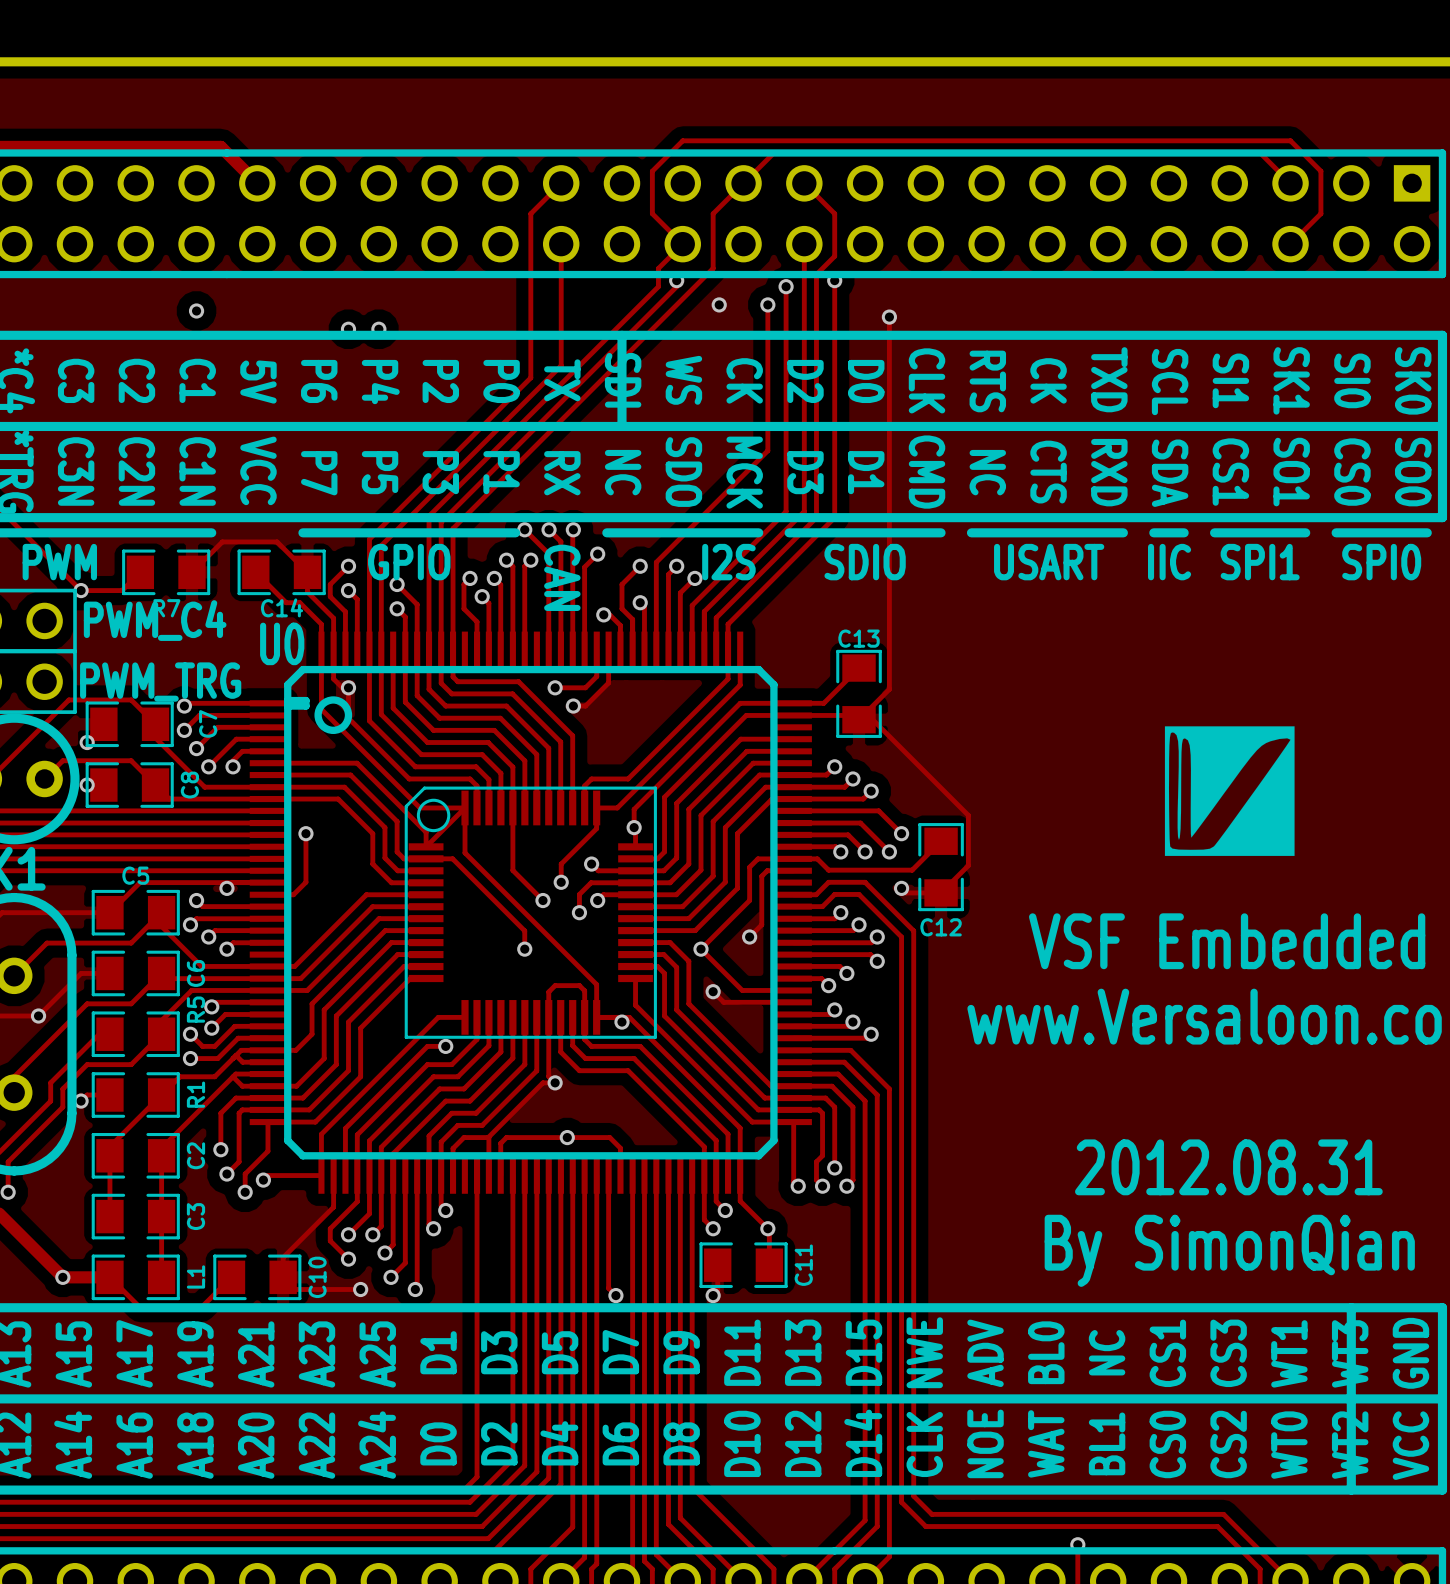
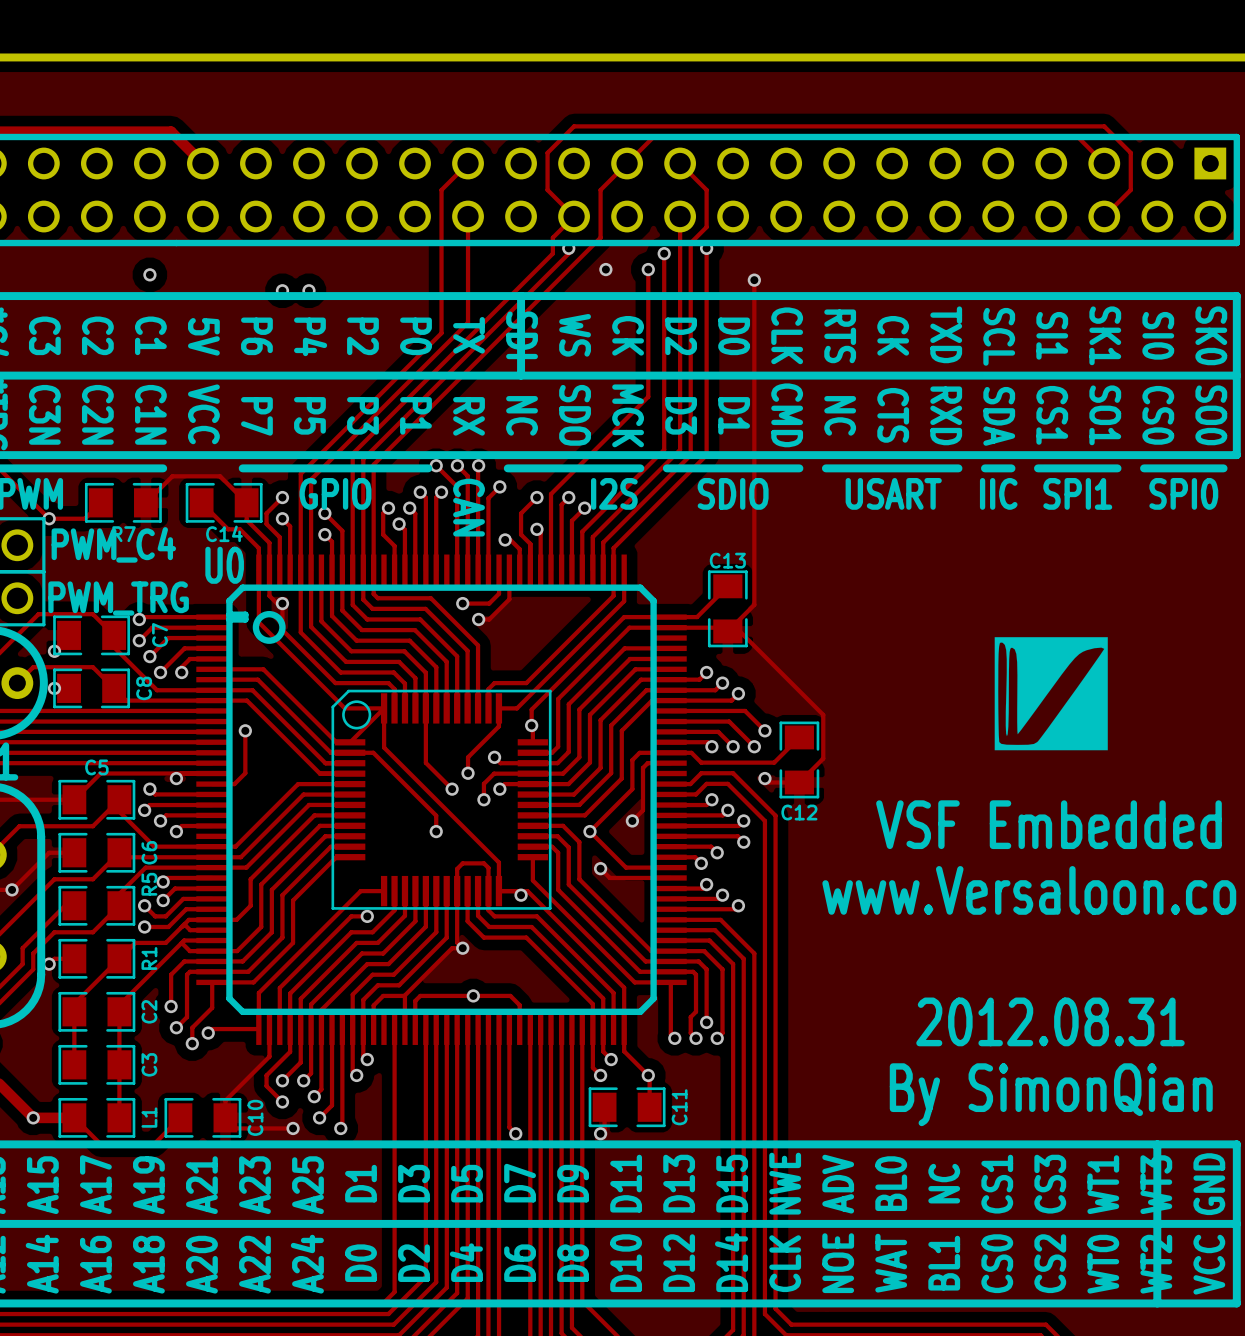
track: (326, 763) (357, 763) (426, 832) (426, 846) -> (263, 669) (336, 742) (350, 742)
track: (320, 775) (350, 775) (397, 821) (397, 851) -> (257, 679) (324, 746)
track: (314, 787) (344, 787) (384, 827) (384, 857) -> (252, 690) (314, 752)
track: (307, 799) (338, 799) (372, 833) (372, 864) -> (246, 700) (303, 757)

